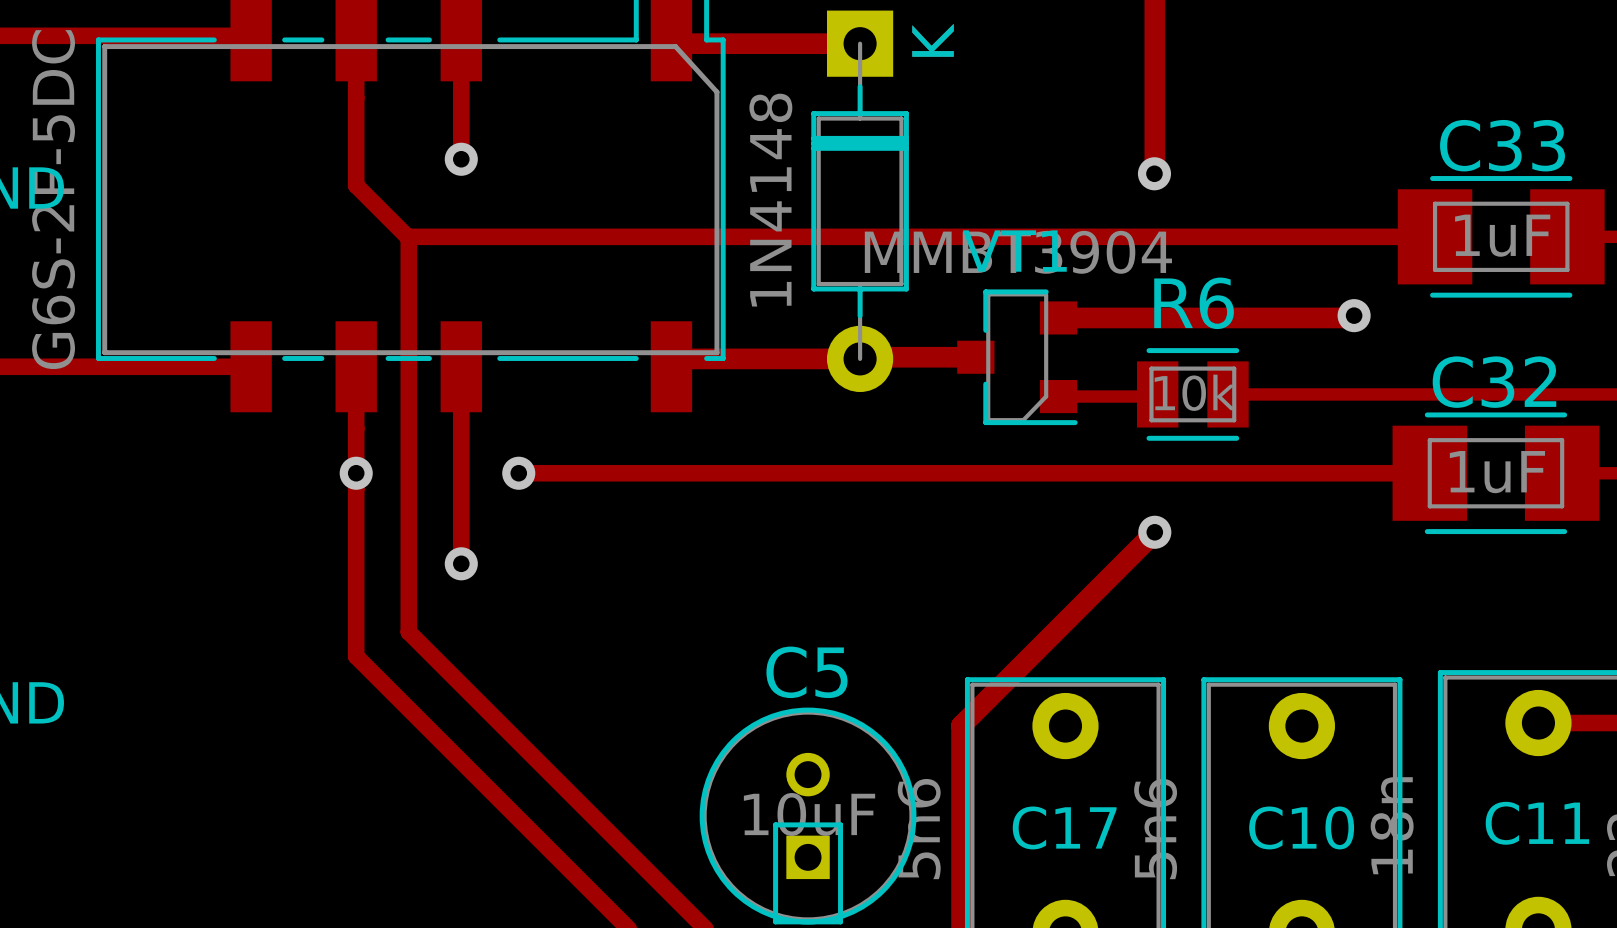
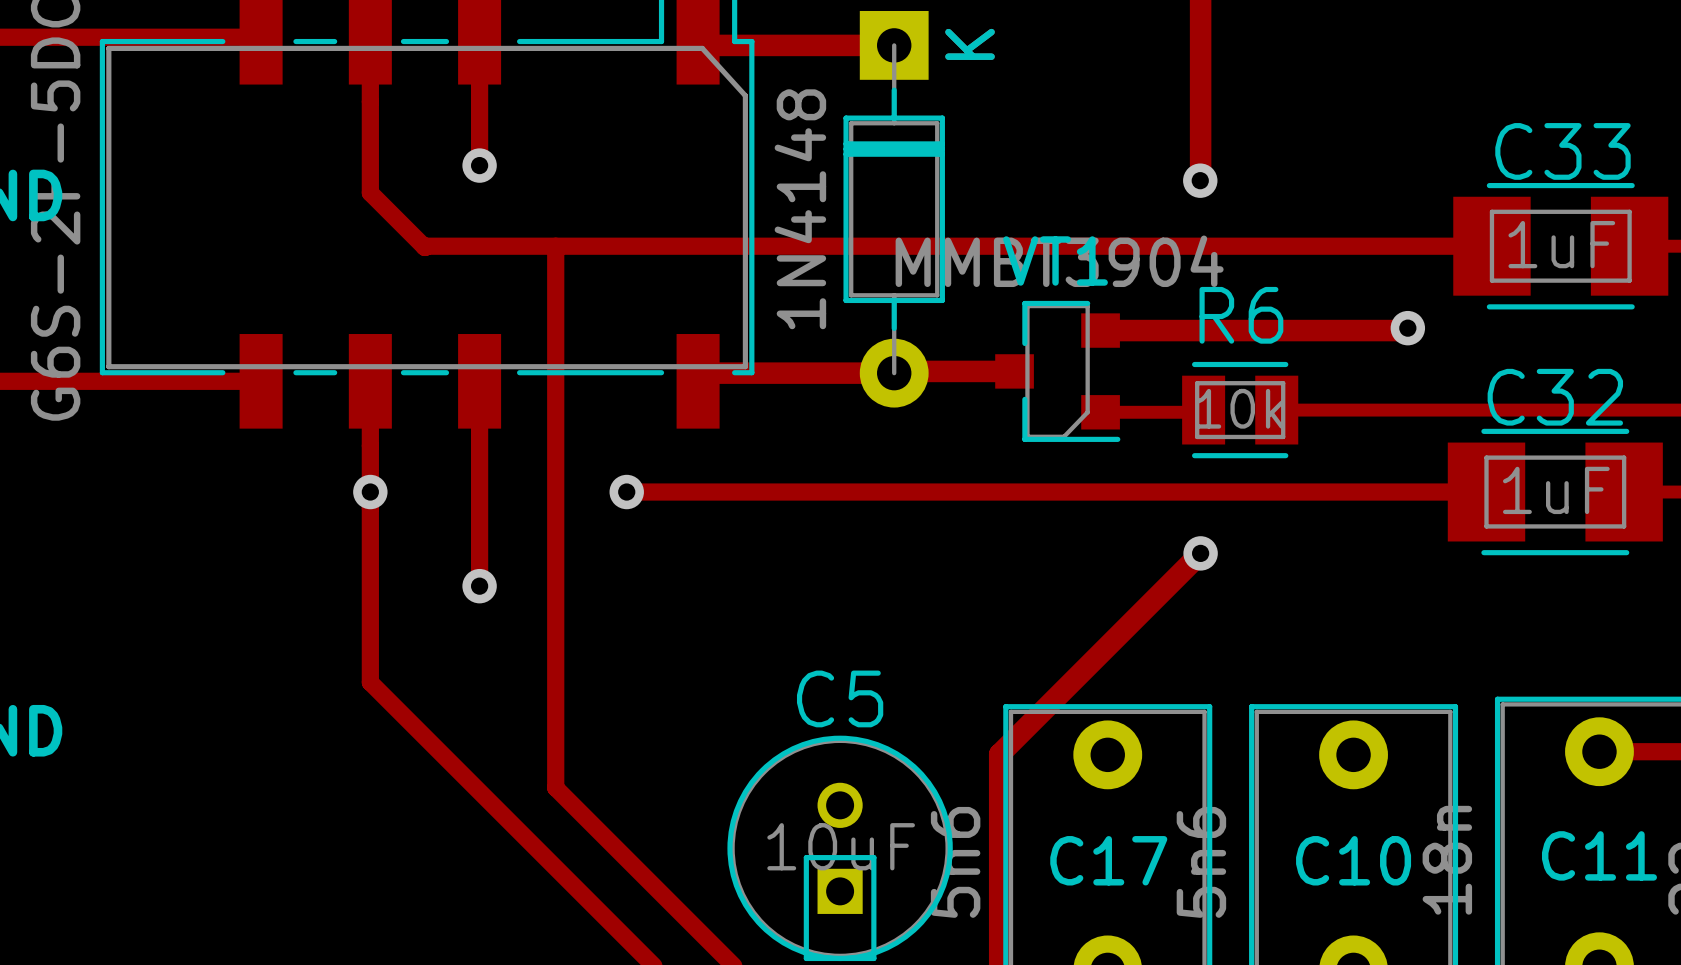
track: (408, 238) (408, 632) (534, 757) -> (555, 246) (555, 787)
track: (518, 473) (602, 473) -> none
via position: (518, 473) -> (626, 492)

